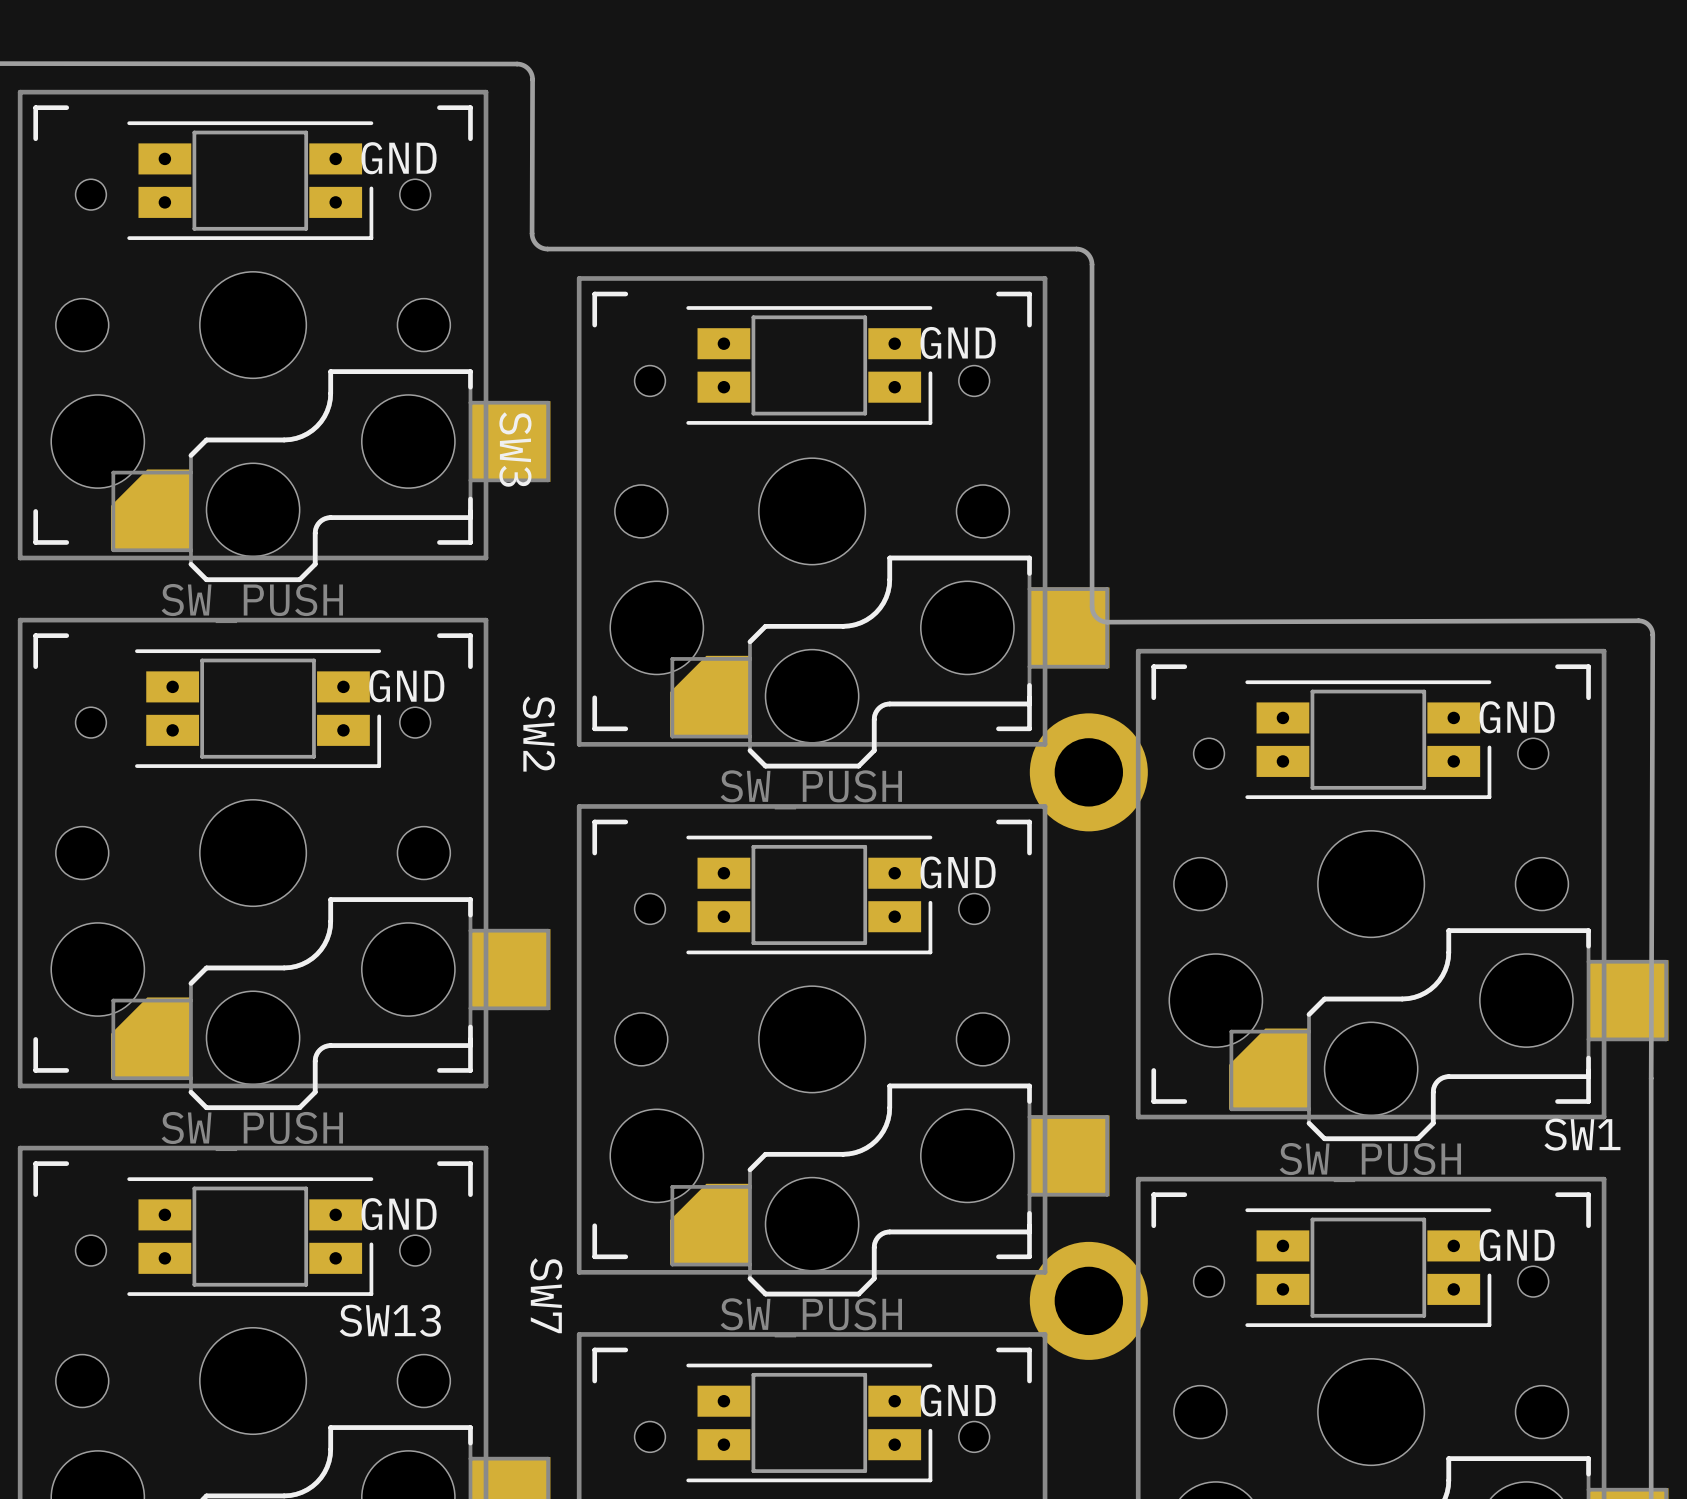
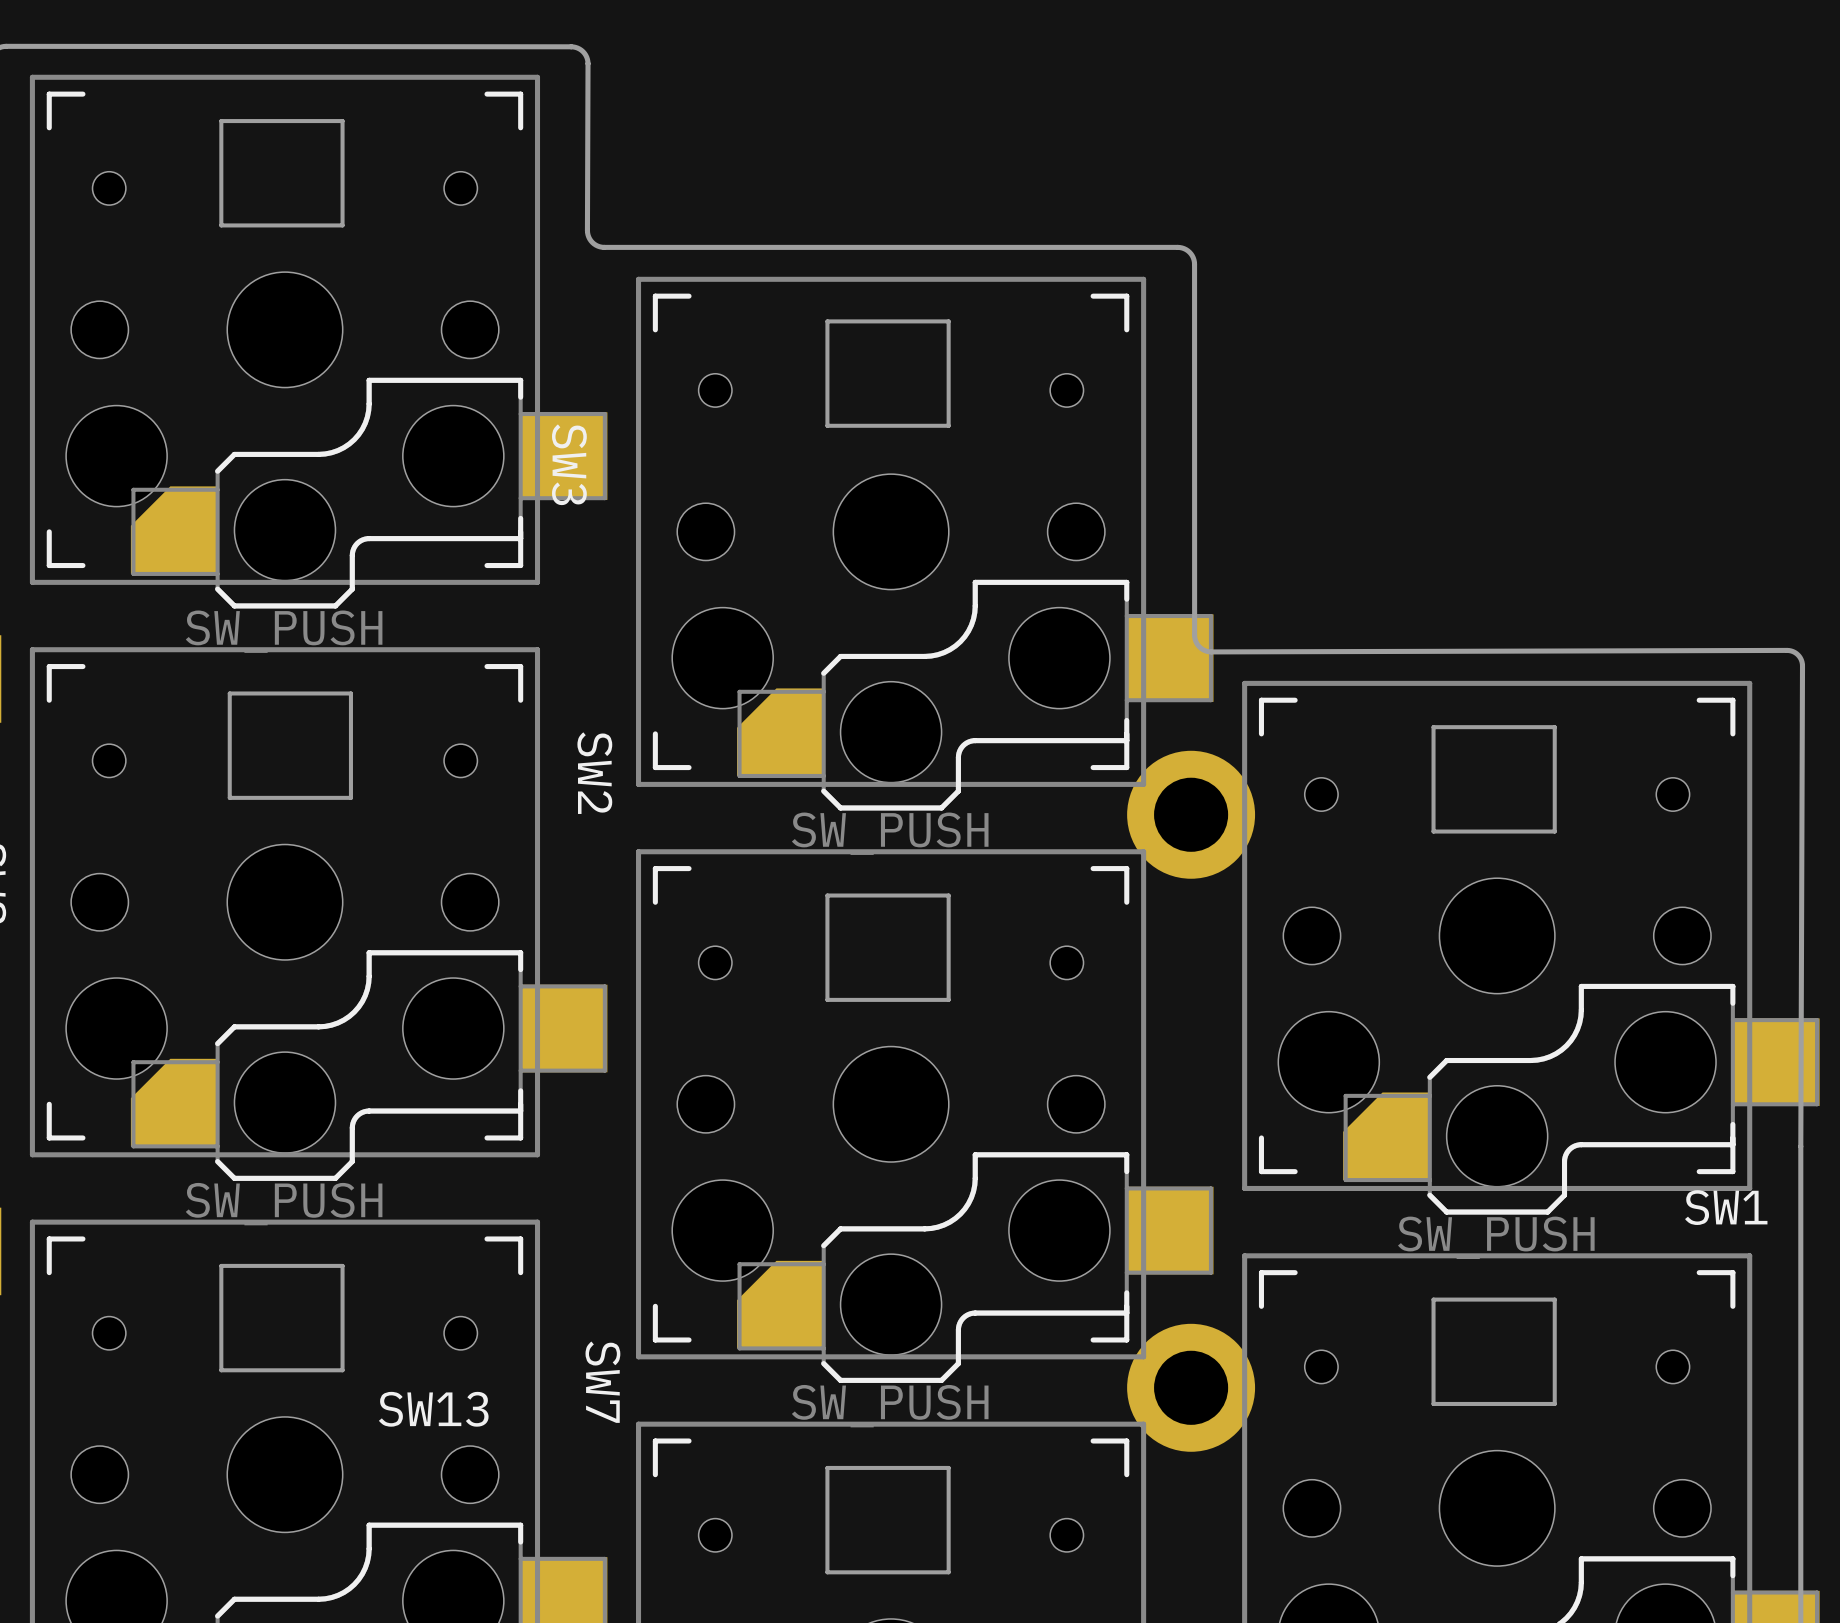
part footprint: [127, 121, 374, 240] -> [219, 119, 345, 228]
part footprint: [686, 306, 933, 425] -> [825, 319, 951, 428]
part footprint: [135, 649, 382, 768] -> [227, 691, 353, 800]
part footprint: [1245, 680, 1492, 800] -> [1431, 725, 1557, 834]
part footprint: [686, 835, 933, 955] -> [825, 893, 951, 1002]
part footprint: [127, 1177, 374, 1296] -> [219, 1263, 345, 1373]
part footprint: [1245, 1208, 1492, 1327] -> [1431, 1297, 1557, 1406]
part footprint: [686, 1363, 933, 1483] -> [825, 1465, 951, 1575]

